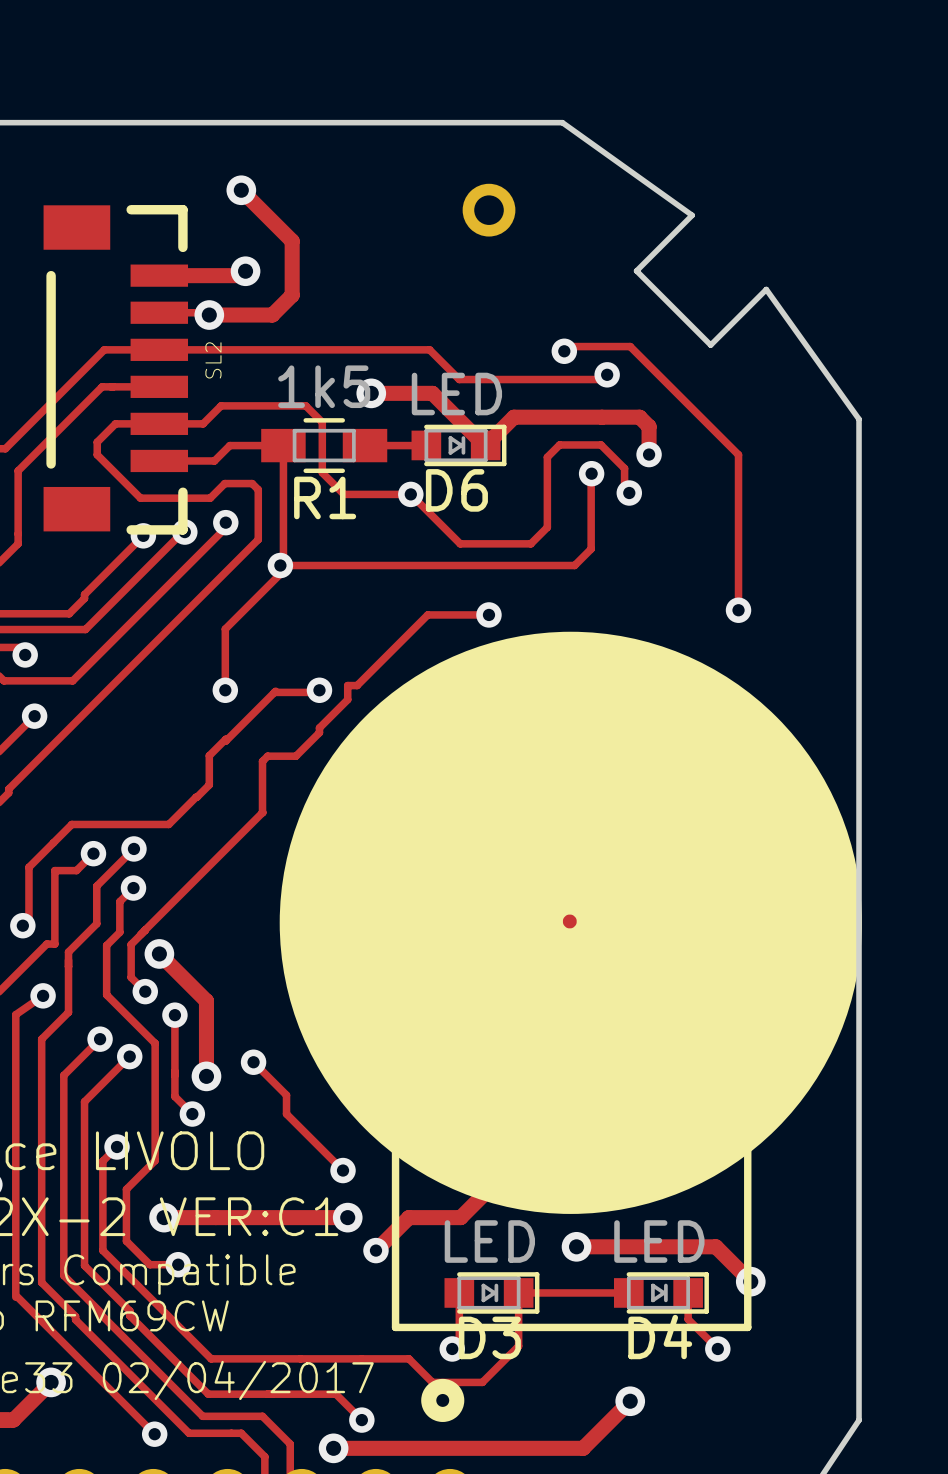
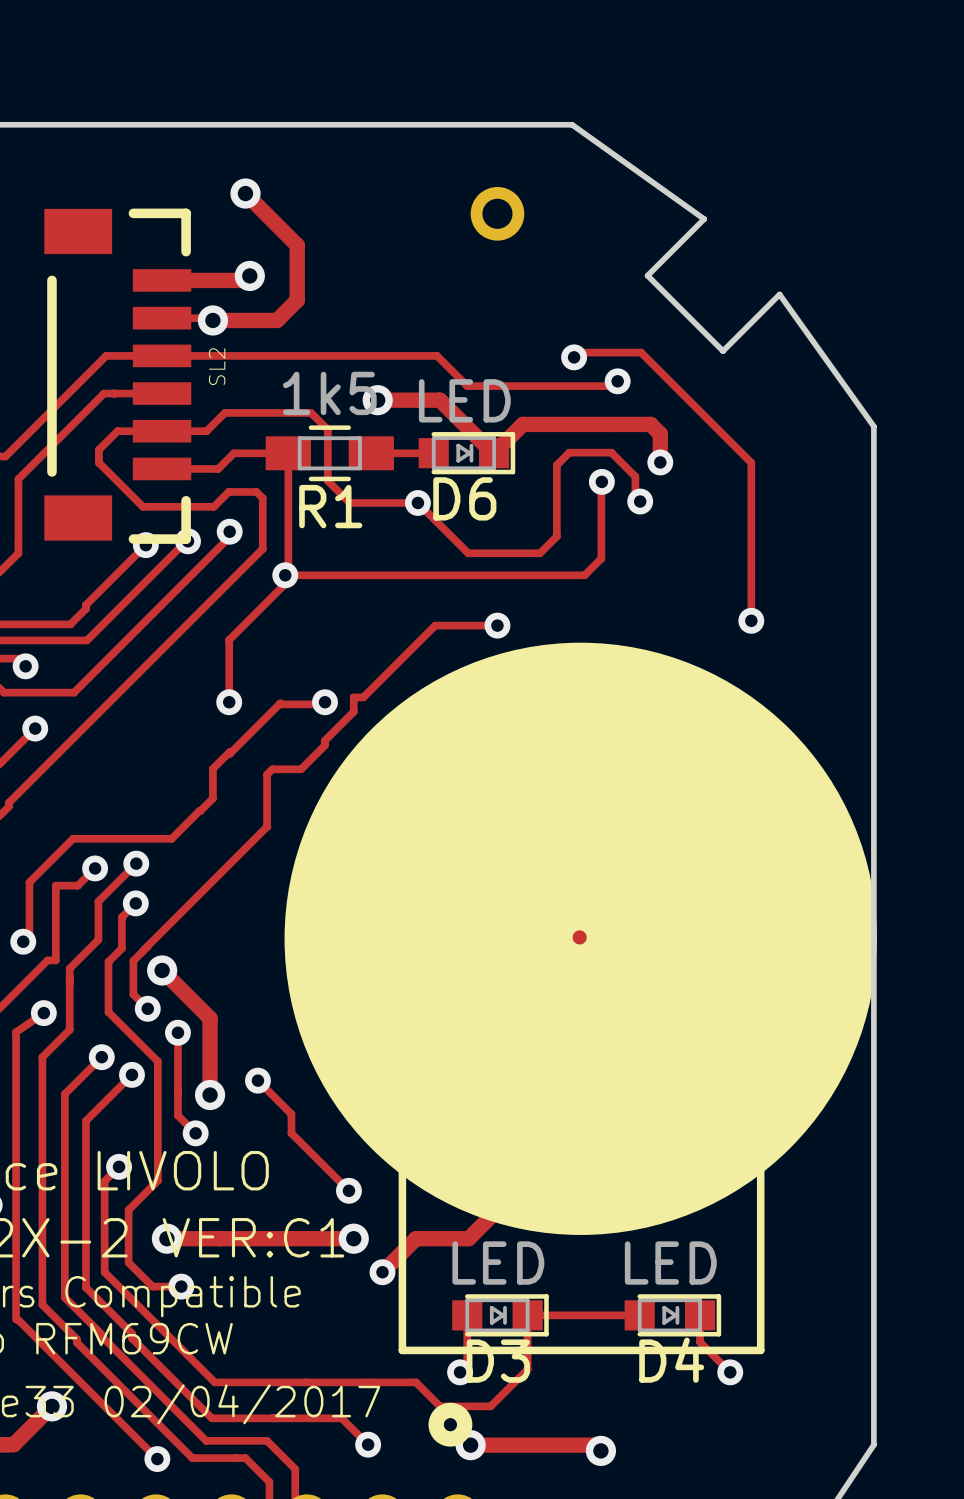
track: (576, 1246) (715, 1246) (750, 1281) -> none
via: (576, 1246) -> none
via: (750, 1281) -> none
track: (630, 1401) (583, 1448) (333, 1448) -> none
via position: (630, 1401) -> (600, 1450)
track: none -> (470, 1445) (595, 1445) (600, 1450)
via: none -> (470, 1445)
via: (333, 1448) -> none

